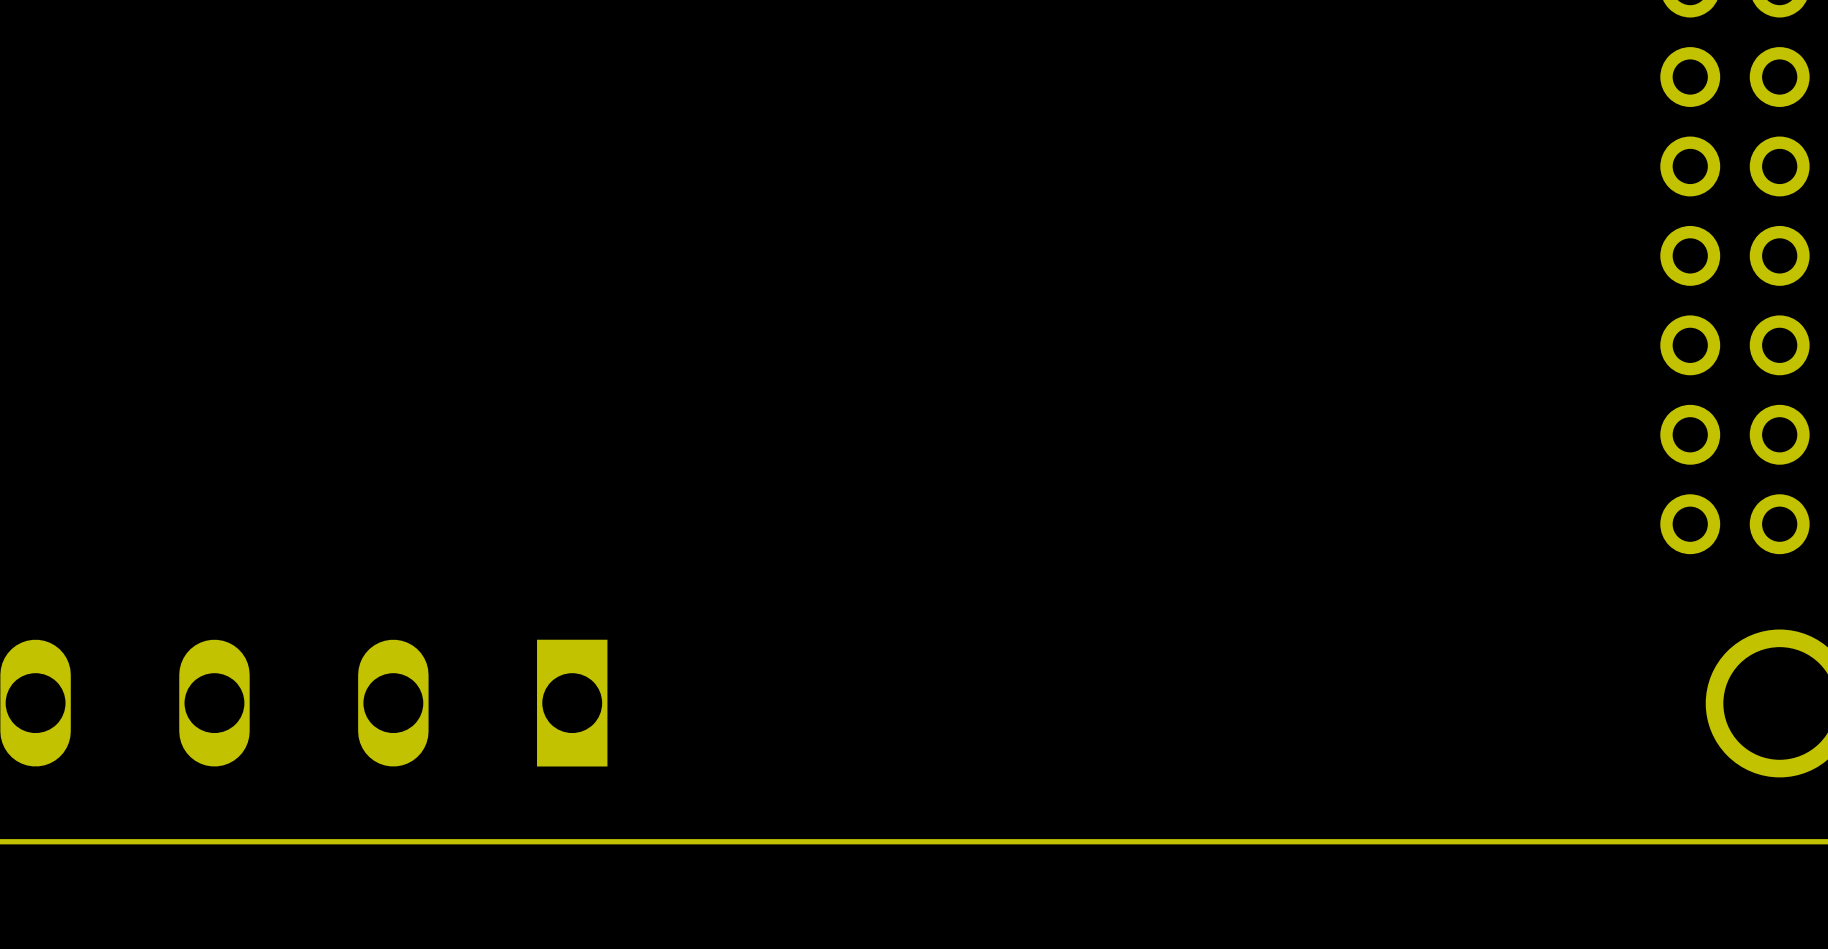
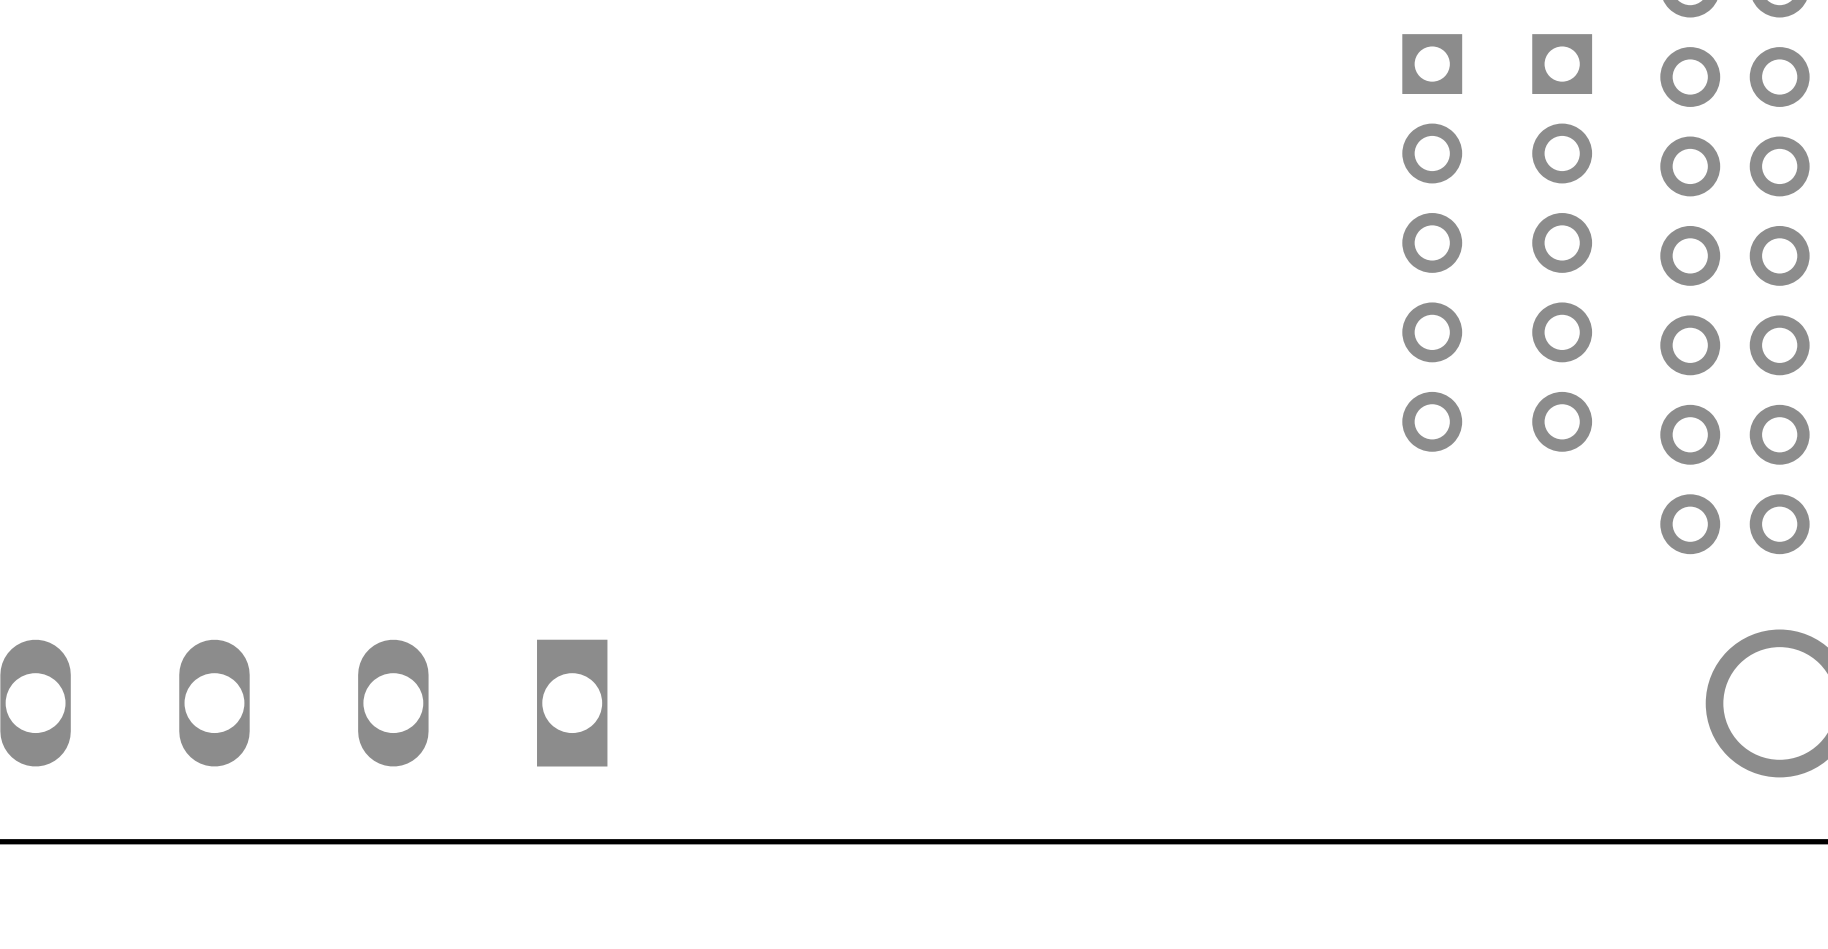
part: none -> (1432, 242)
part: none -> (1562, 242)

